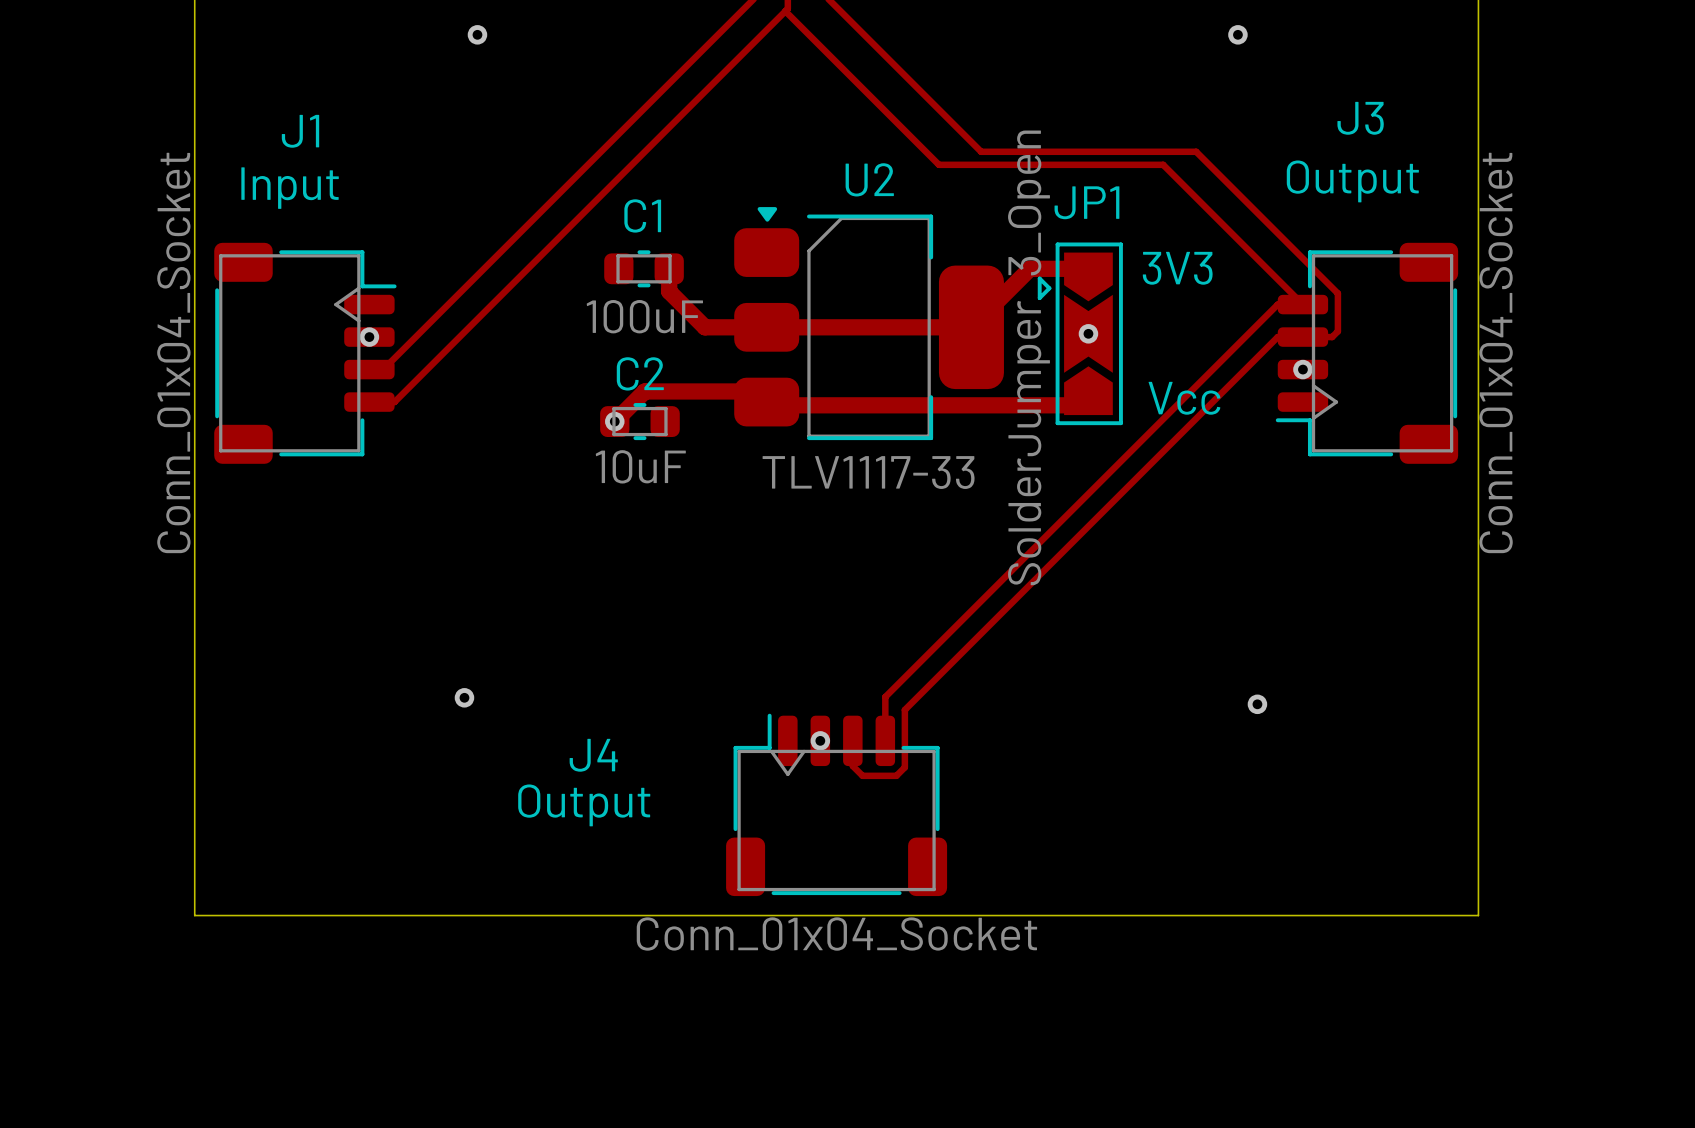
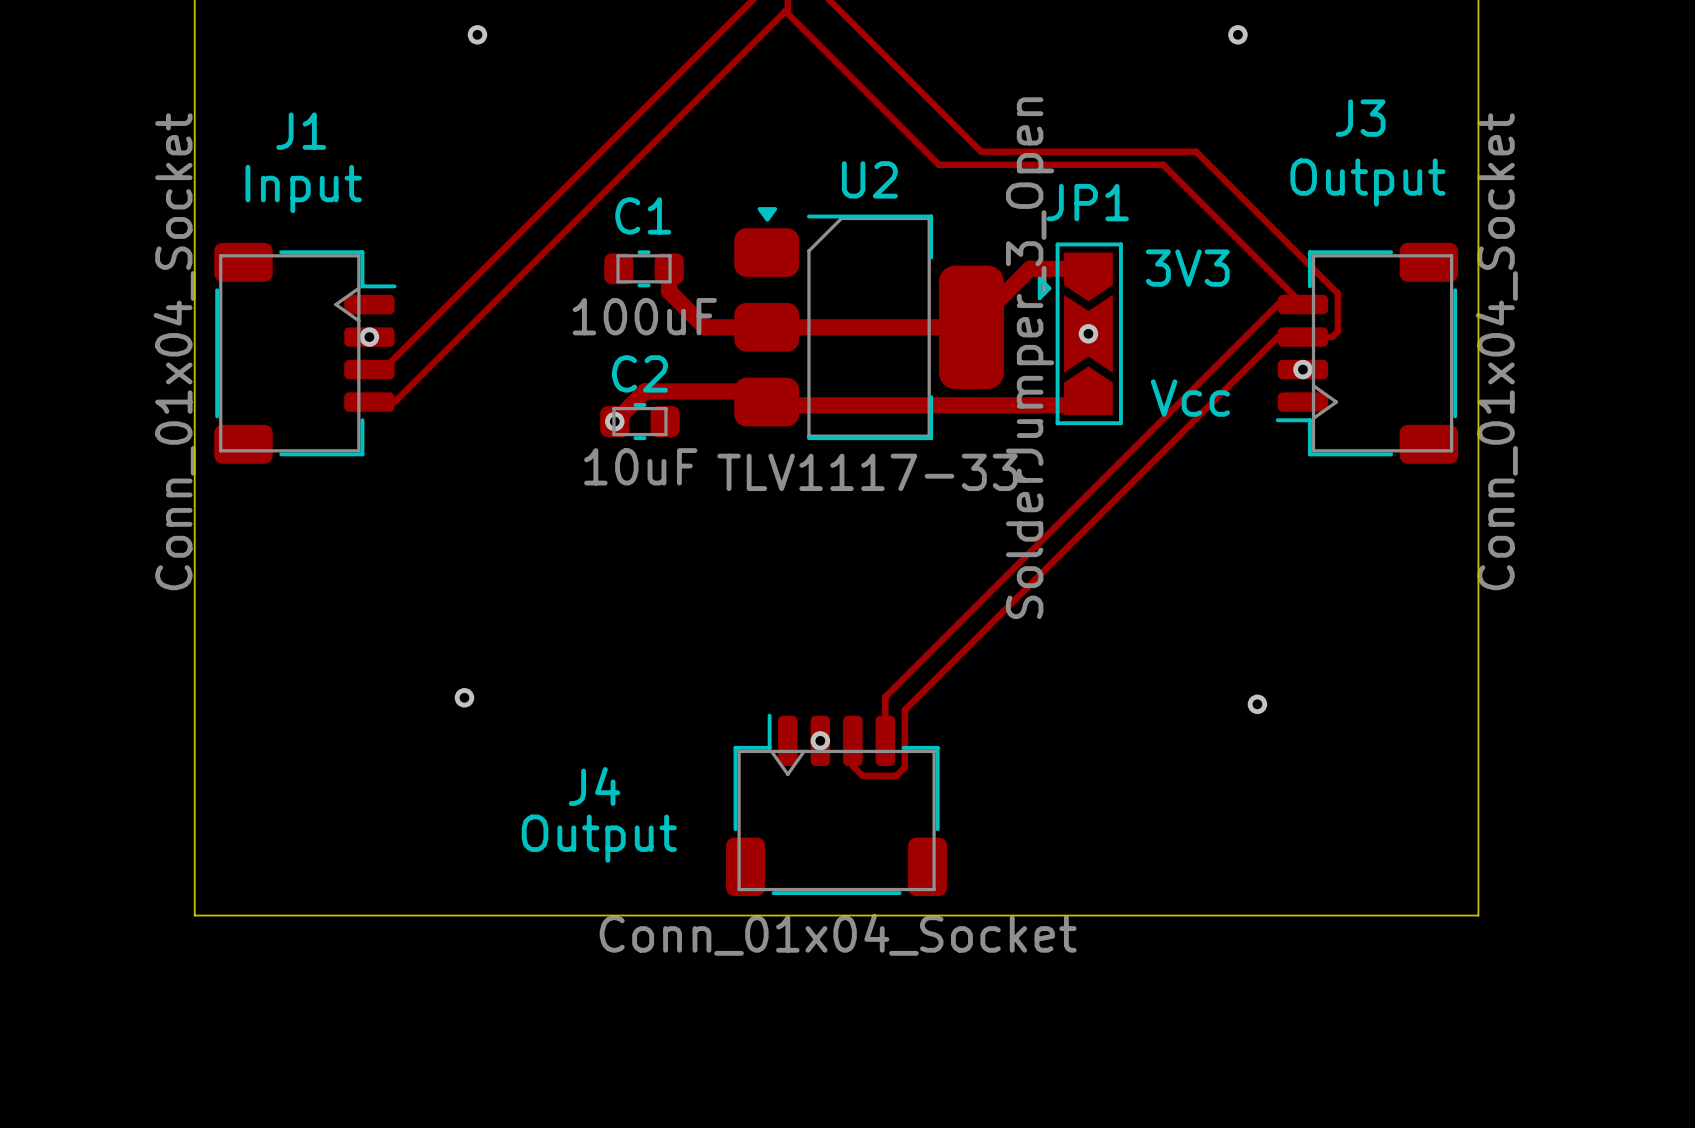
J4 name position: J4 (593, 755) -> J4 (594, 786)
text position: Output (584, 805) -> Output (599, 838)

